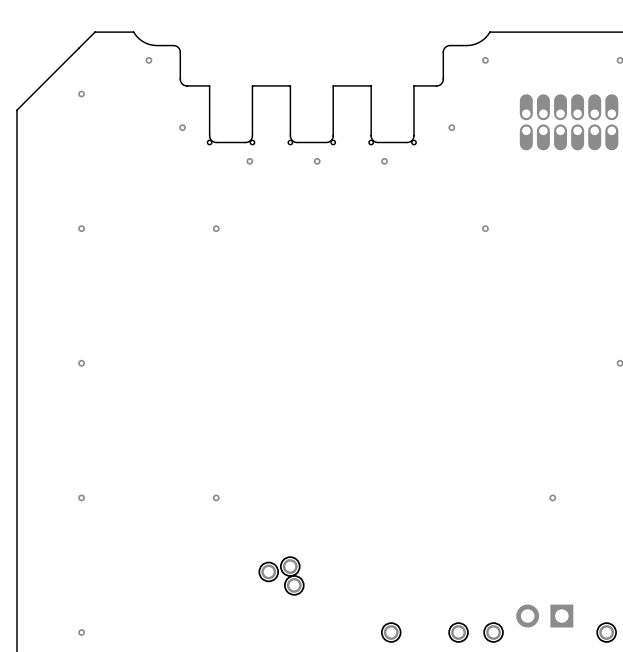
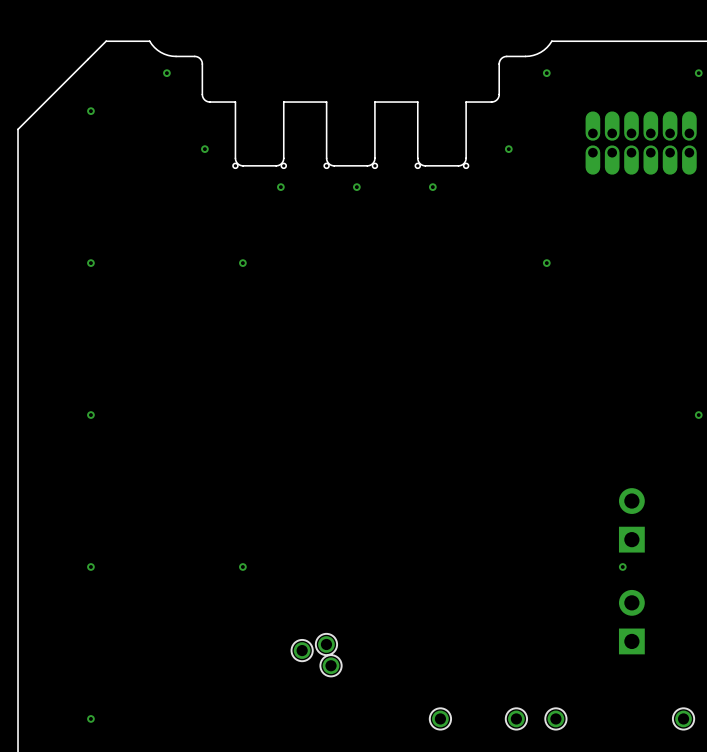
part: none -> (631, 520)
part rotation: 0° (544, 616) -> 90° clockwise (631, 622)
part position: (544, 616) -> (631, 622)

